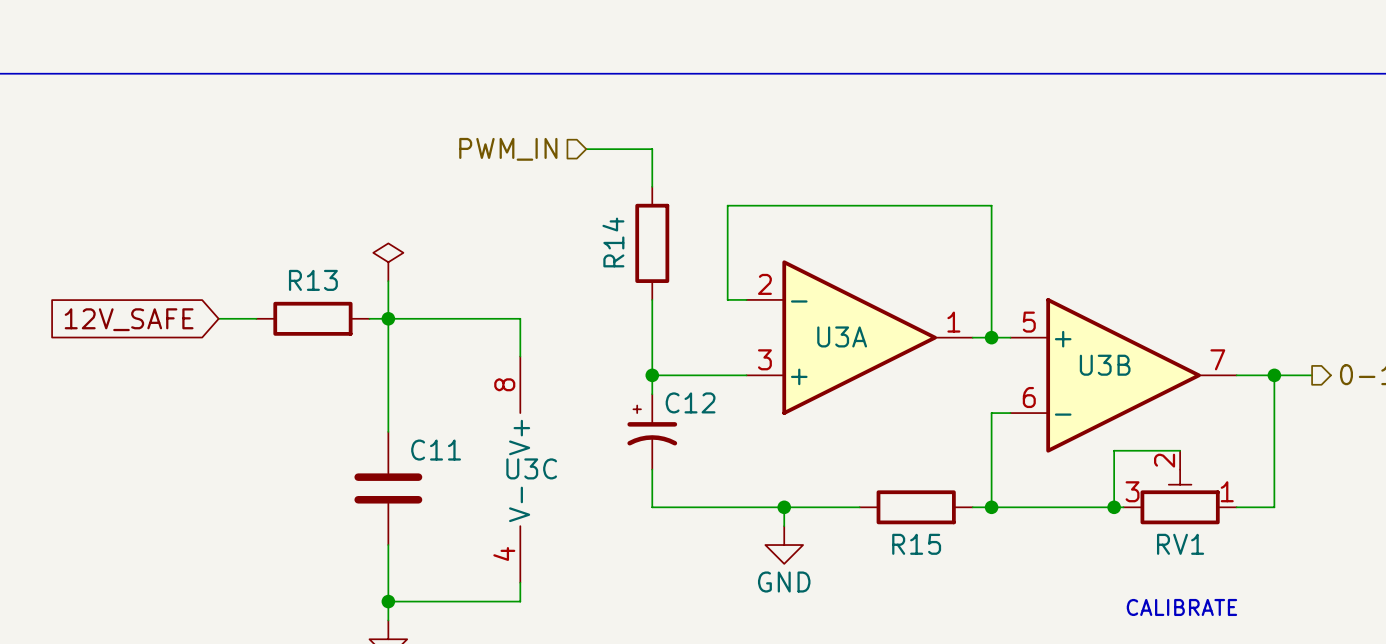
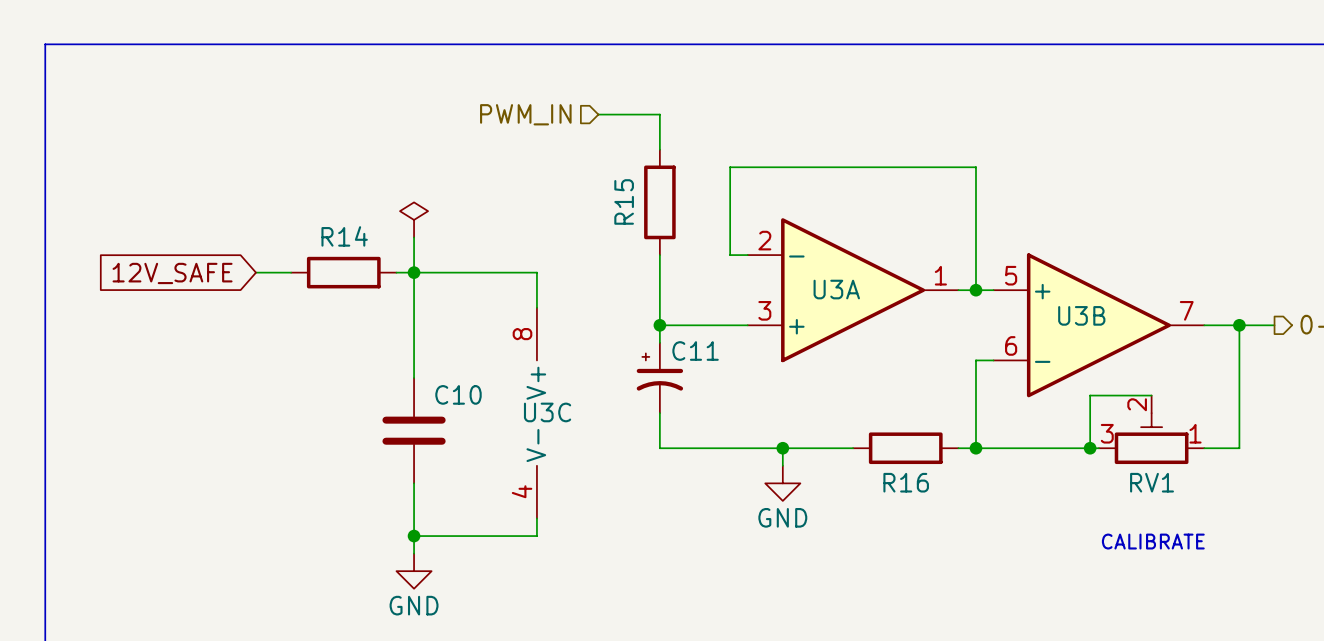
R14 name: R14 (613, 242) -> R15 (624, 201)
R13 name: R13 (313, 280) -> R14 (344, 236)
C12 name: C12 (690, 402) -> C11 (695, 351)
C11 name: C11 (436, 450) -> C10 (458, 394)
R15 name: R15 (916, 544) -> R16 (906, 482)

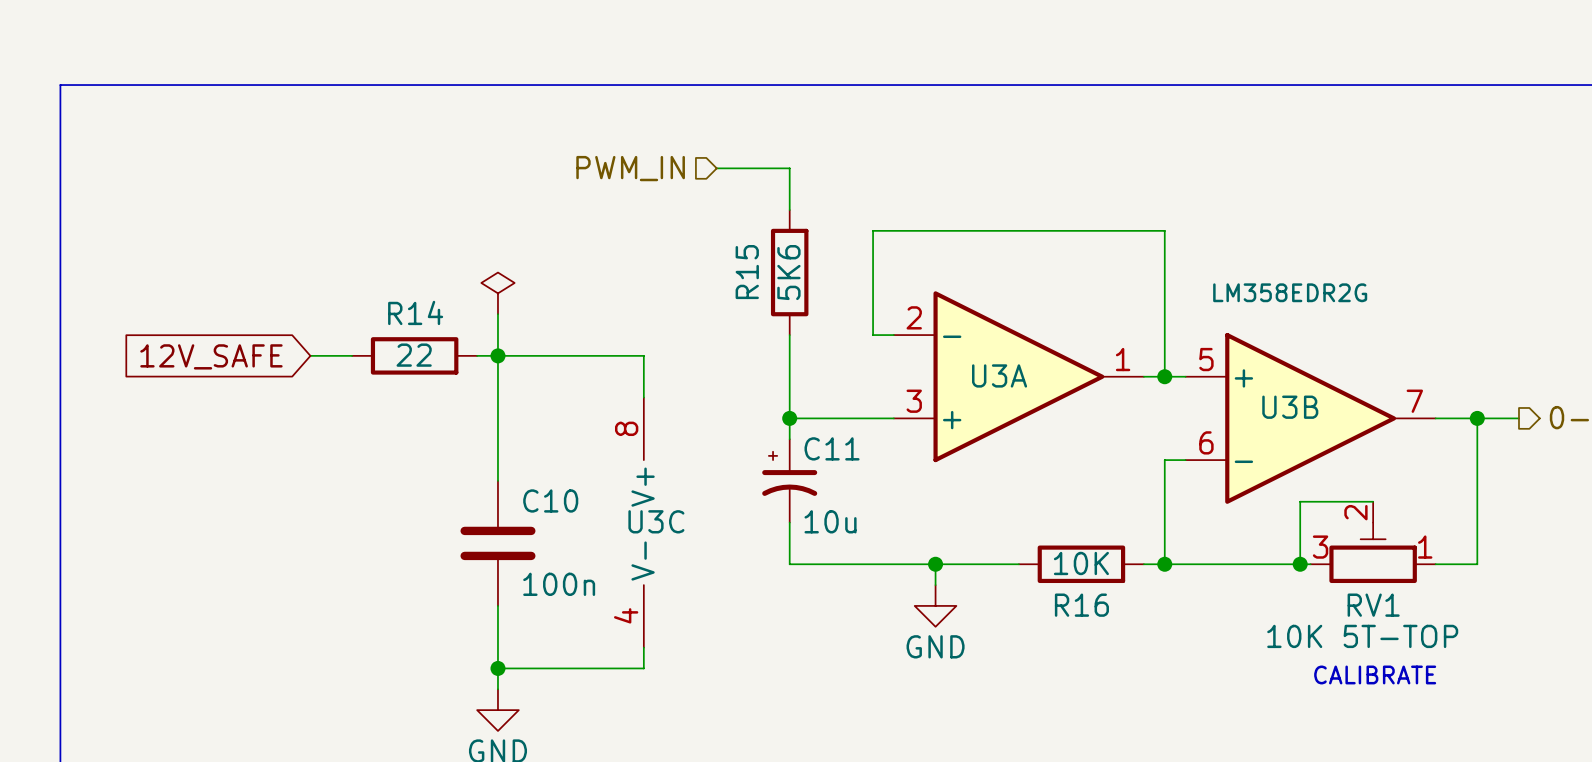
R15 value: none -> 5K6 (788, 272)
U3B value: none -> LM358EDR2G (1290, 292)
R14 value: none -> 22 (414, 355)
C11 value: none -> 10u (830, 521)
R16 value: none -> 10K (1081, 563)
C10 value: none -> 100n (559, 584)
RV1 value: none -> 10K 5T-TOP (1362, 636)

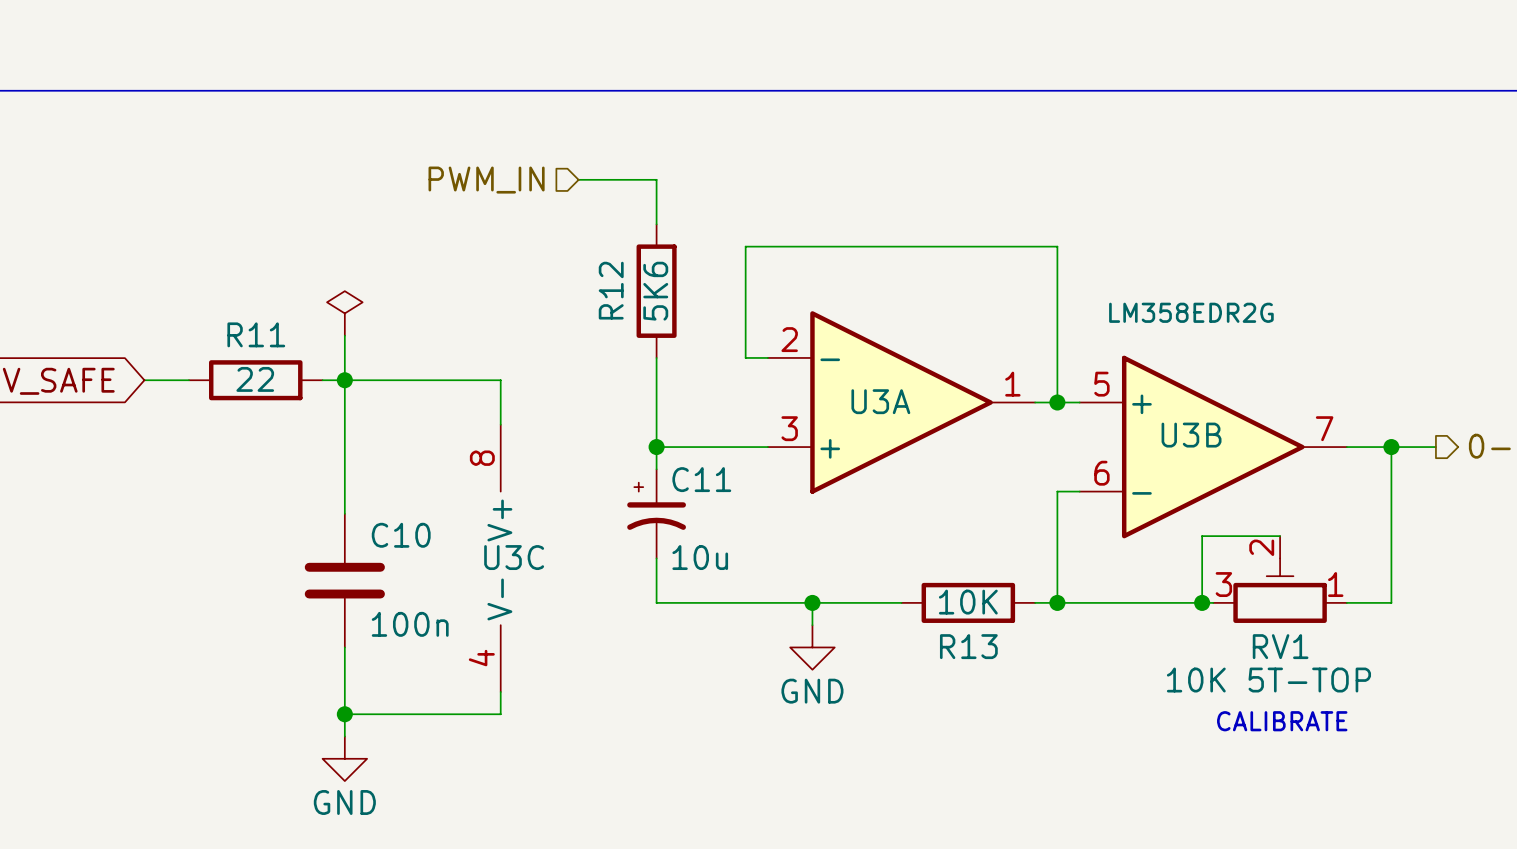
R15 name: R15 (747, 272) -> R12 (611, 290)
R14 name: R14 (415, 312) -> R11 (256, 334)
R16 name: R16 (1081, 605) -> R13 (968, 646)

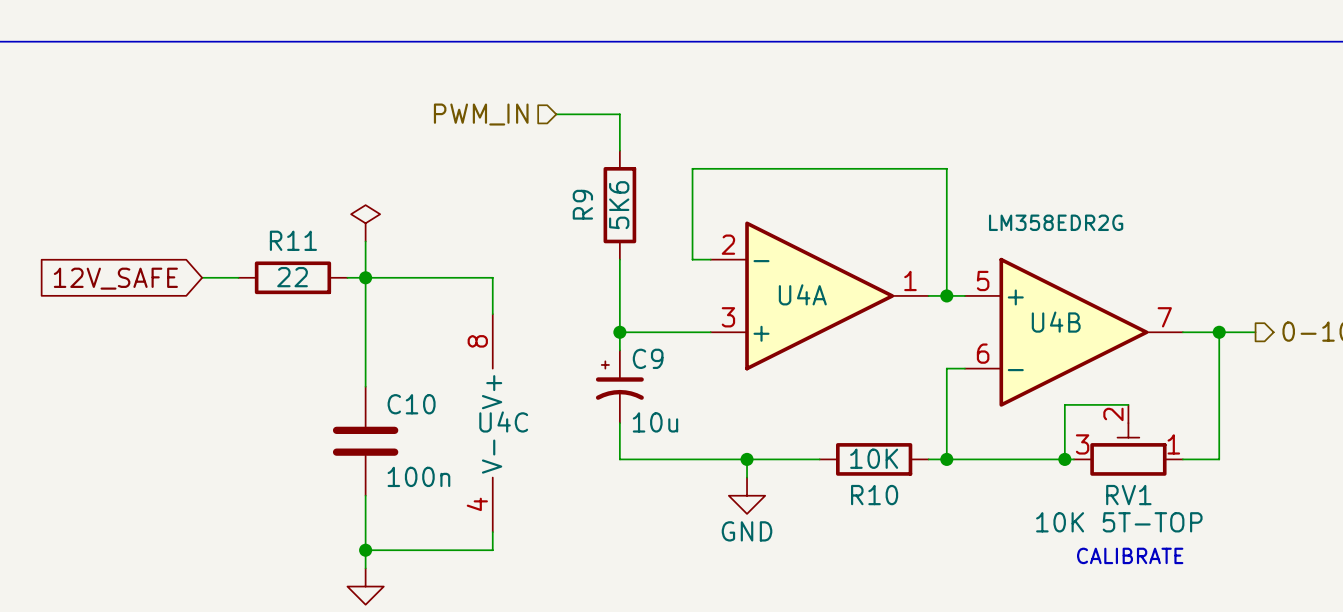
R12 name: R12 (611, 290) -> R9 (582, 204)
U3A name: U3A (880, 401) -> U4A (802, 294)
U3B name: U3B (1191, 435) -> U4B (1056, 322)
C11 name: C11 (701, 479) -> C9 (648, 358)
U3C name: U3C (514, 557) -> U4C (503, 421)
R13 name: R13 (968, 646) -> R10 (874, 495)

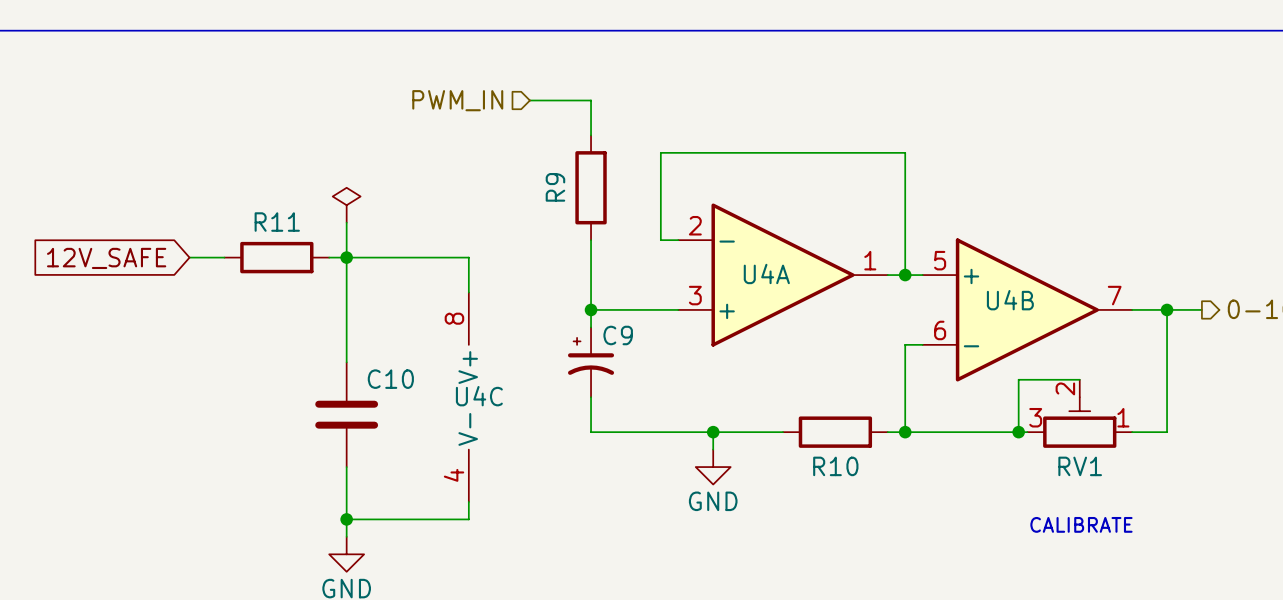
R9 value: 5K6 (619, 205) -> none
U4B value: LM358EDR2G (1056, 222) -> none
R11 value: 22 (292, 277) -> none
C9 value: 10u (655, 422) -> none
R10 value: 10K (874, 458) -> none
C10 value: 100n (418, 476) -> none
RV1 value: 10K 5T-TOP (1119, 522) -> none

